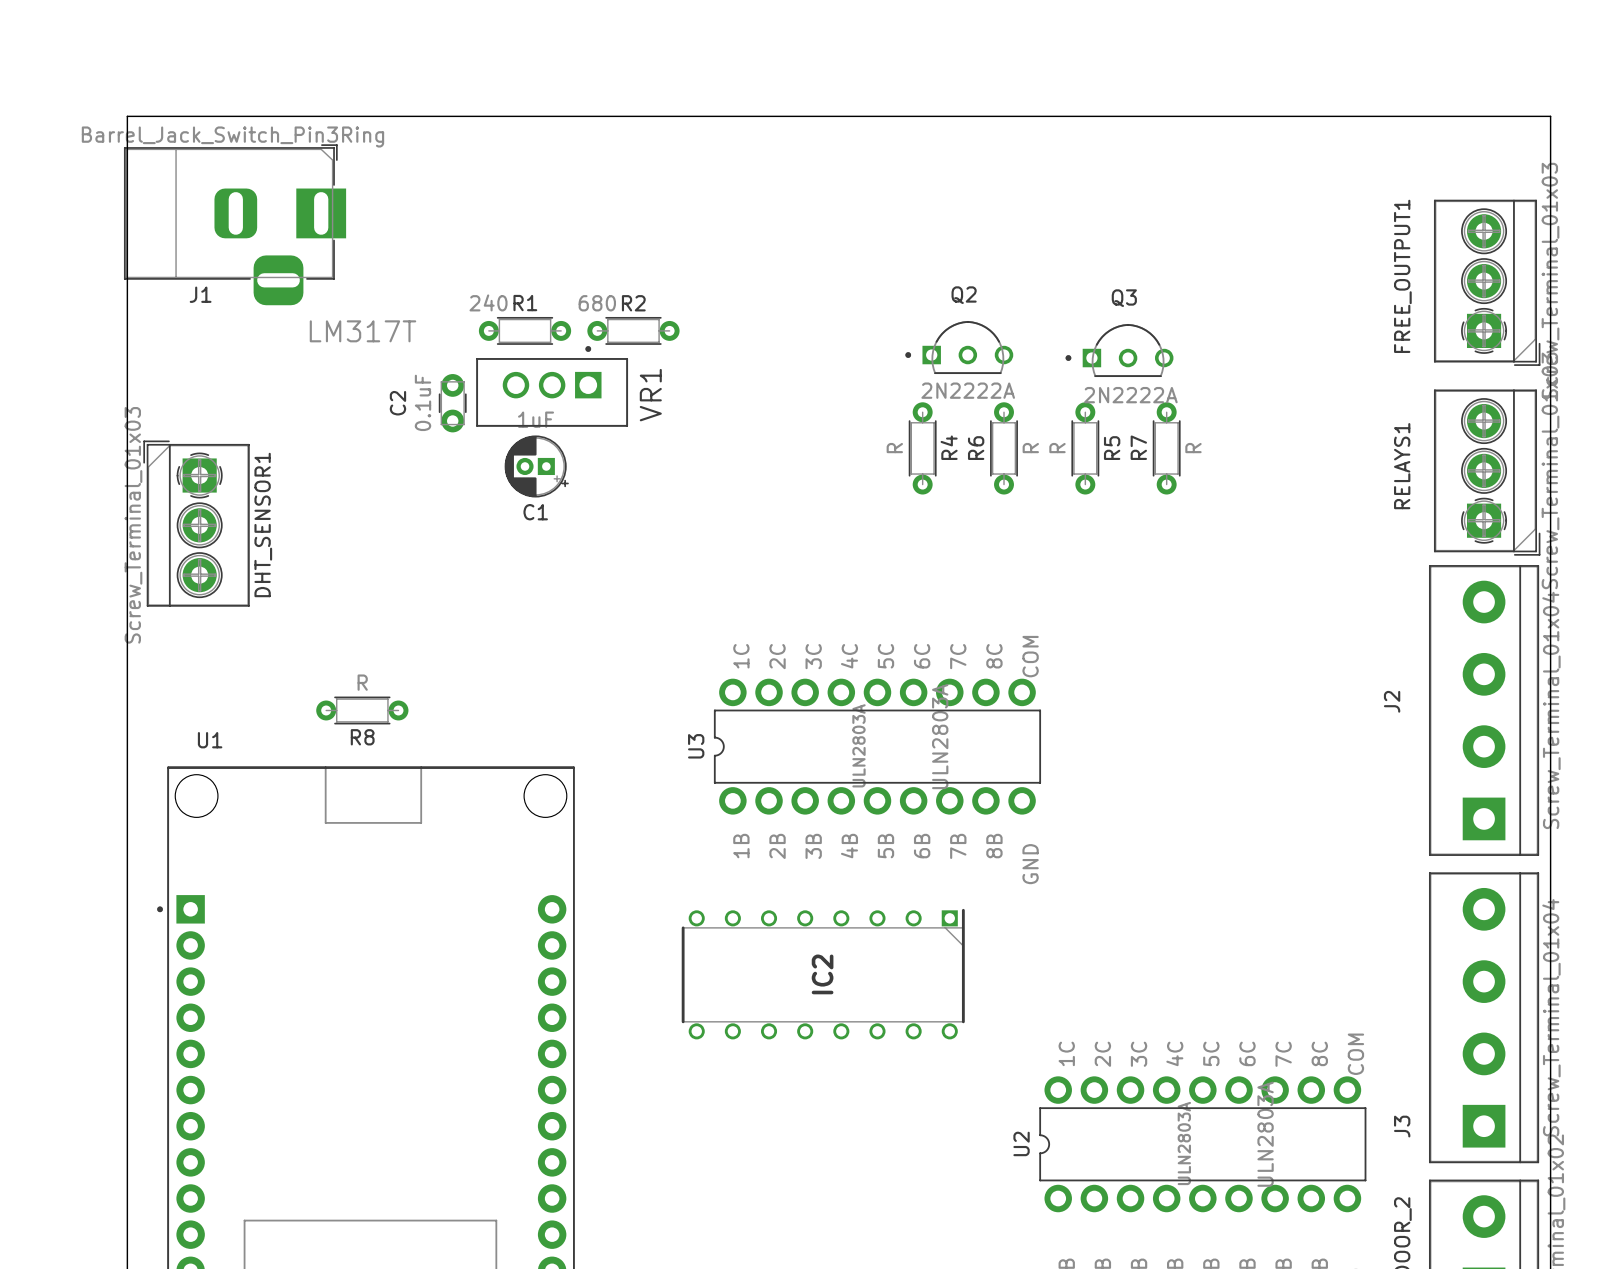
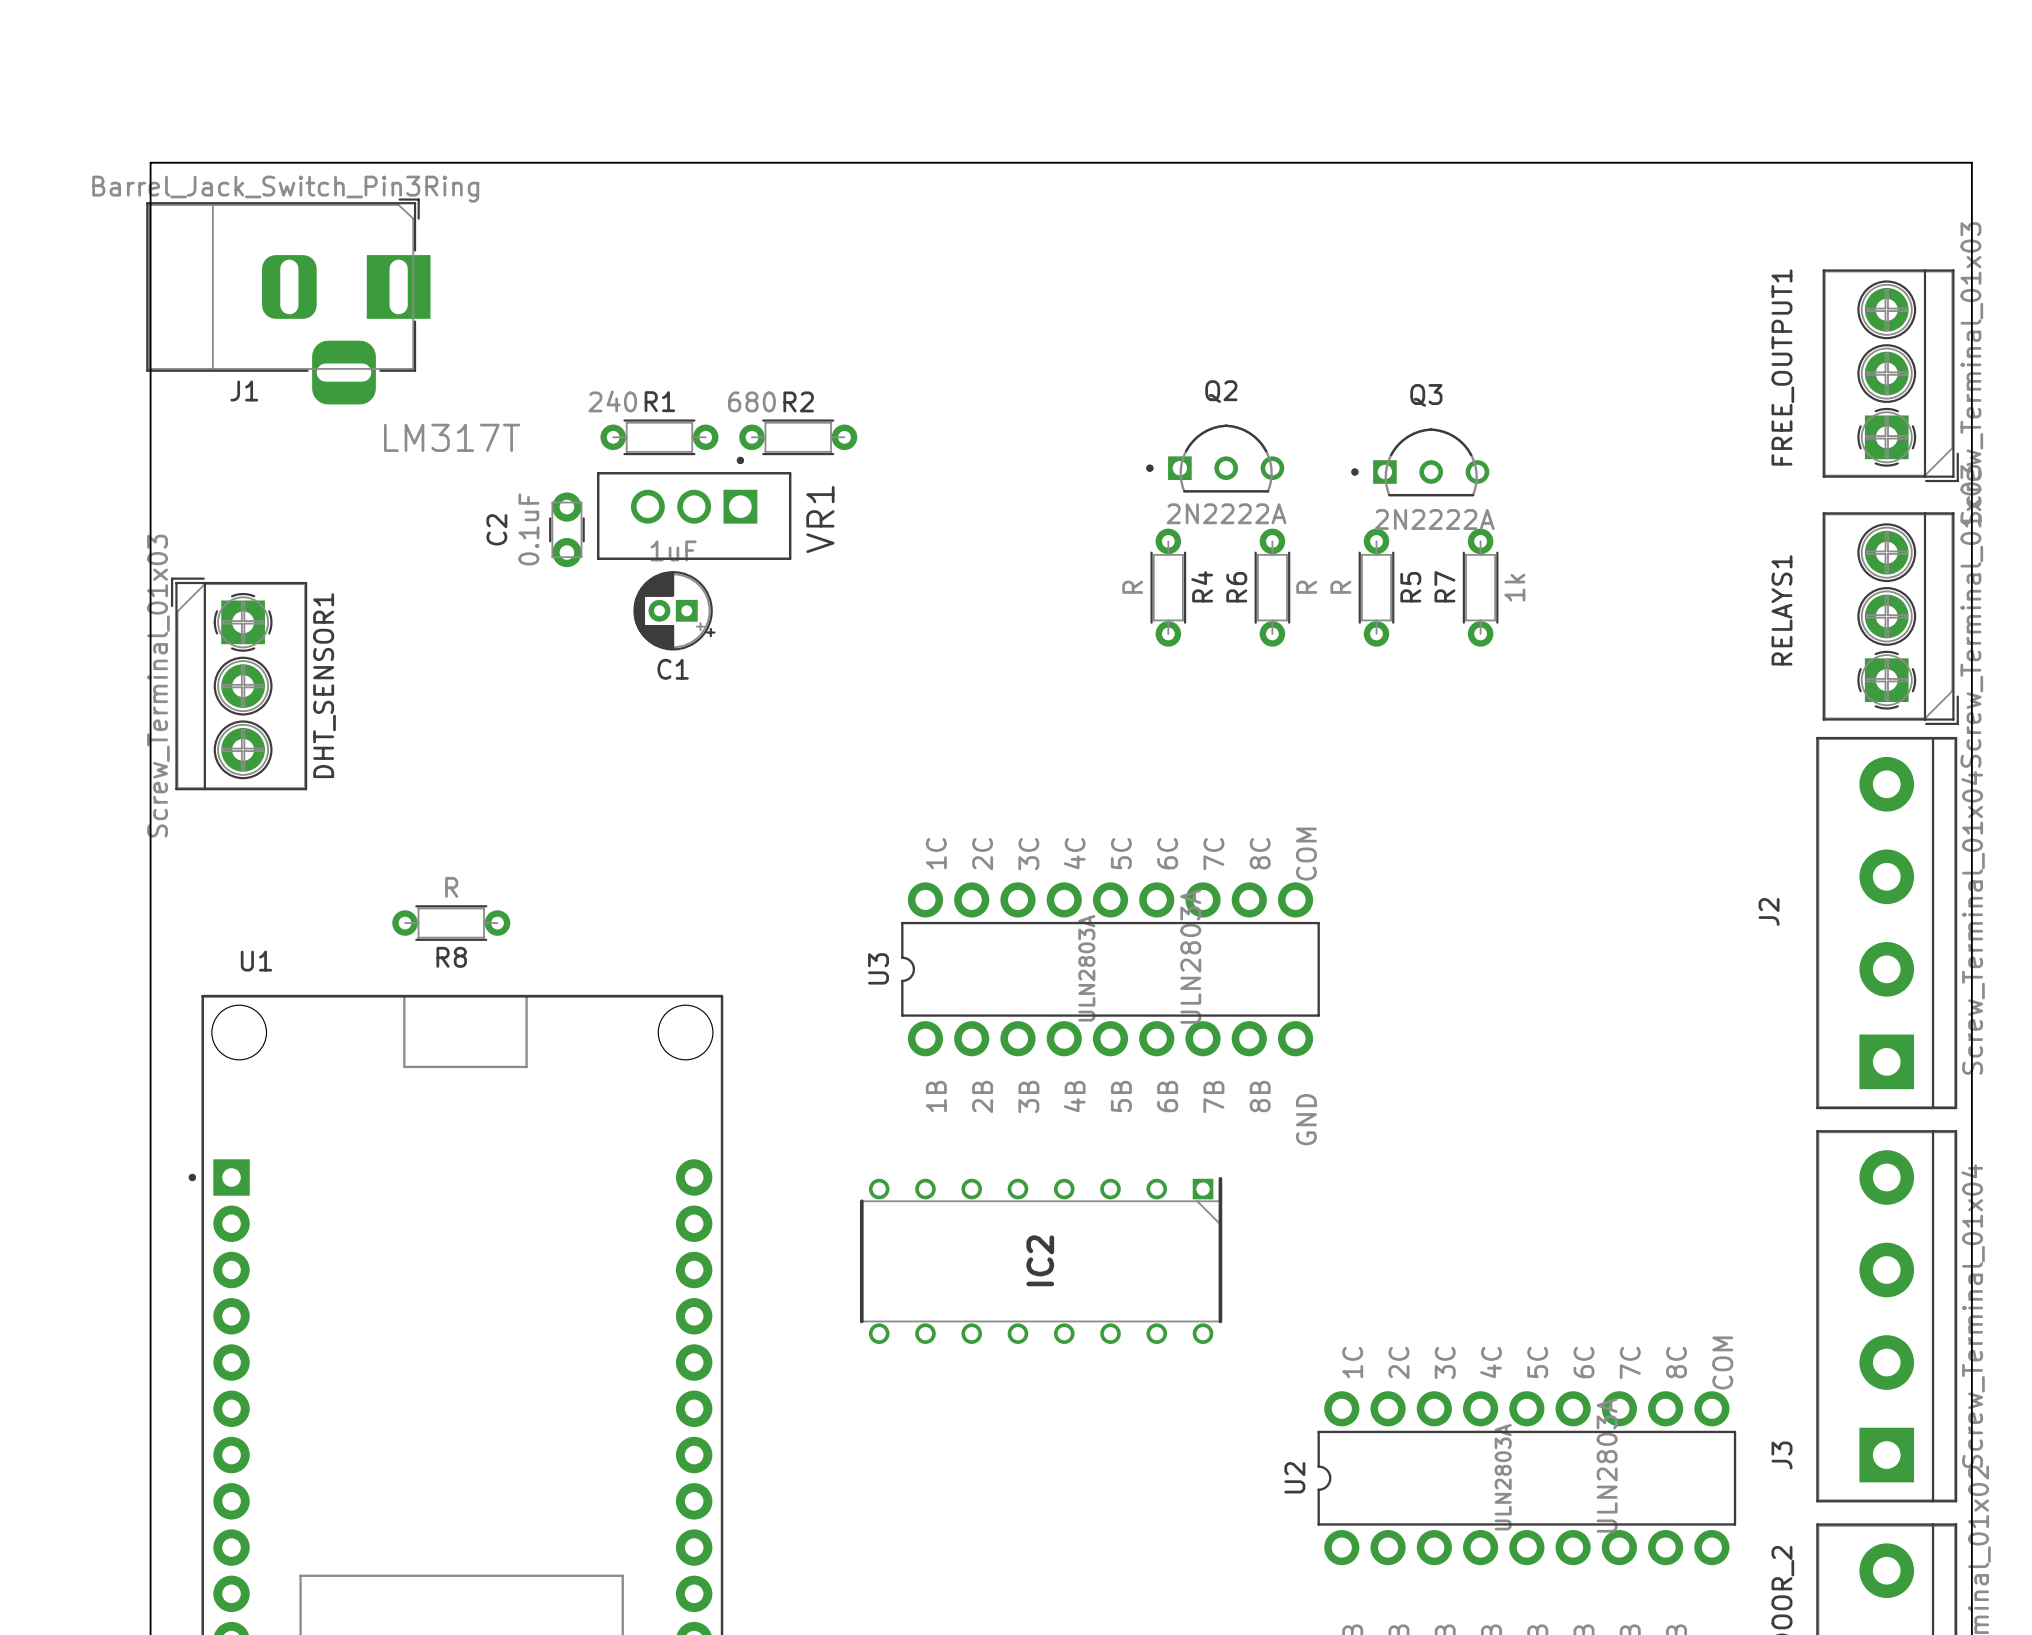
R7 value: R (1193, 448) -> 1k (1514, 587)

